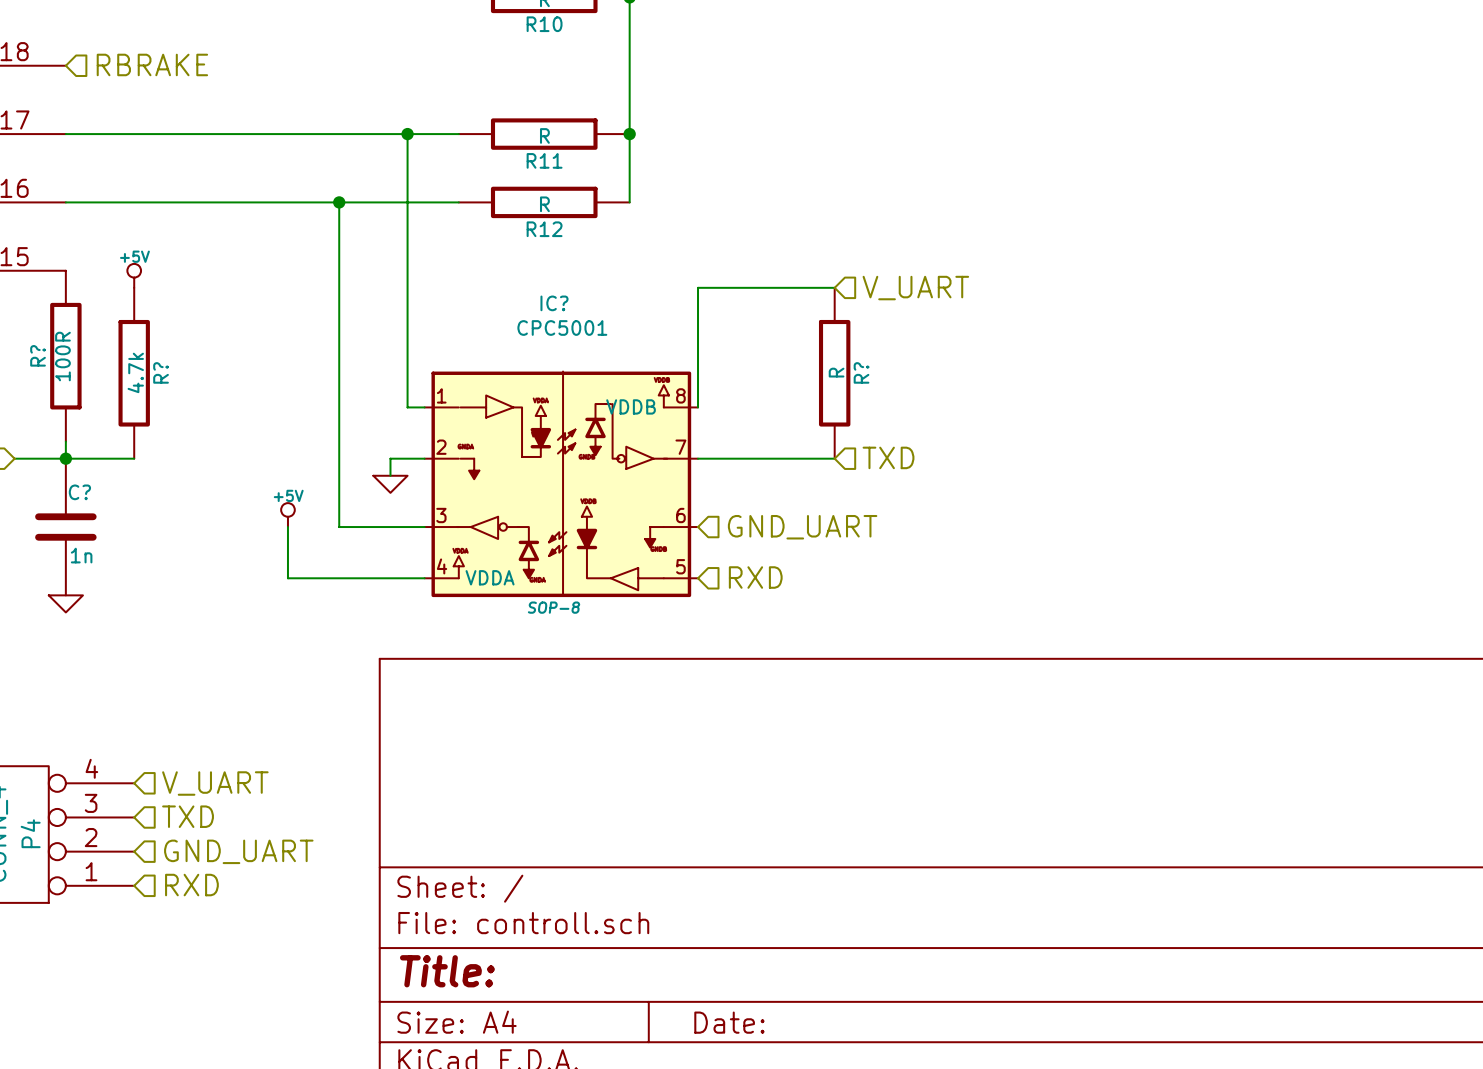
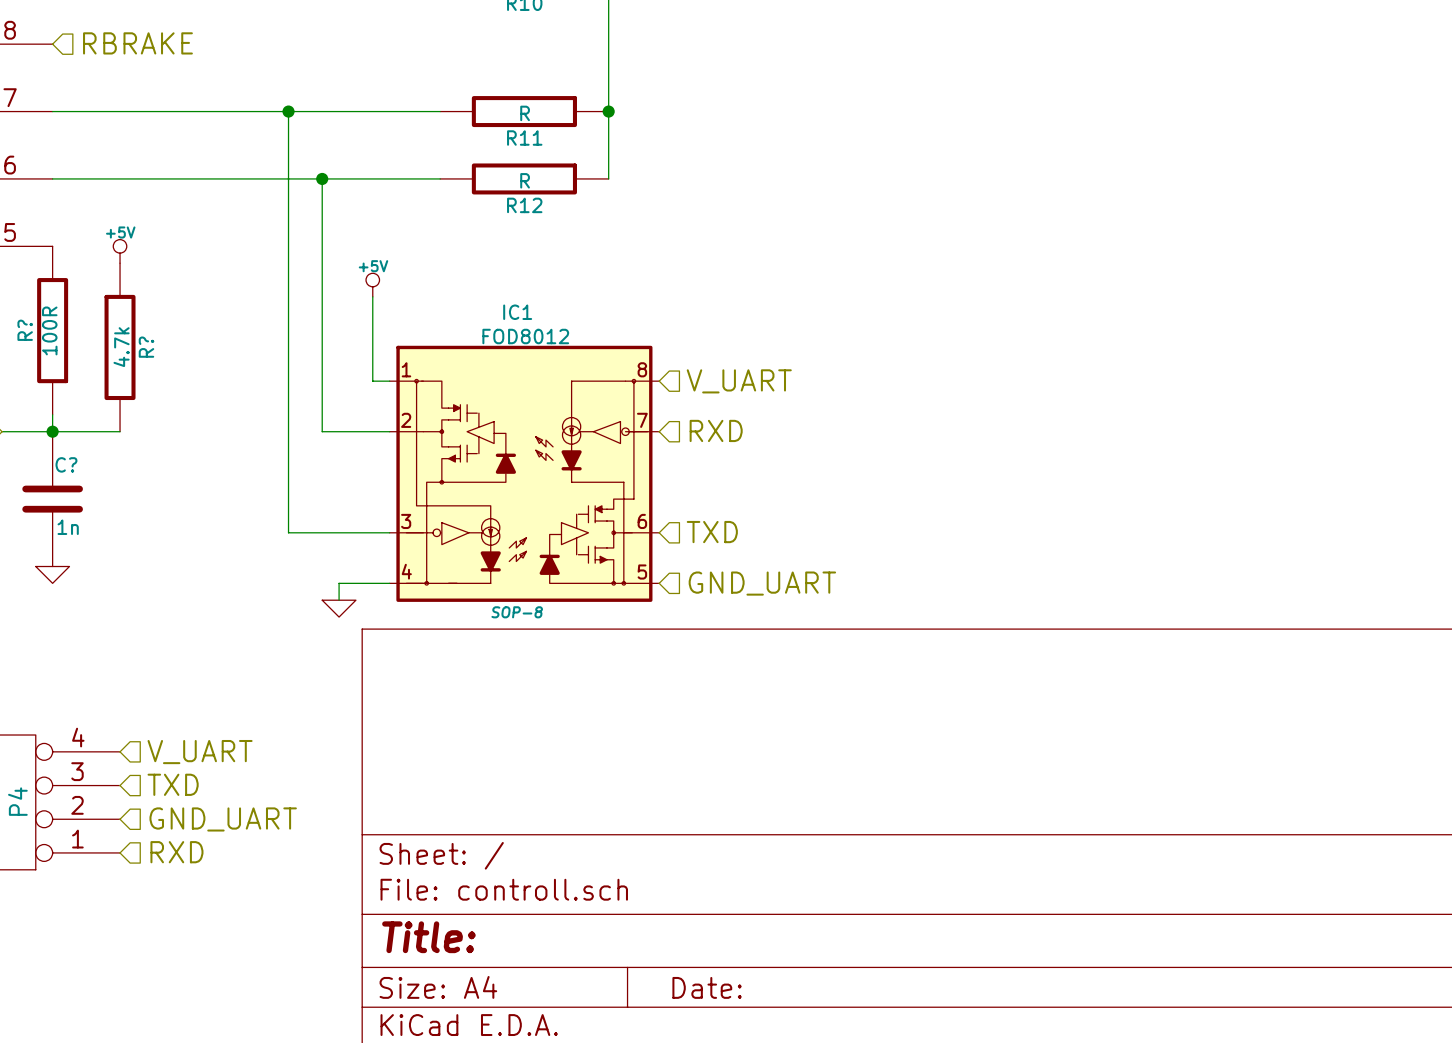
wire: none -> (288, 111) (288, 532) (389, 532)
junction: none -> (288, 111)
wire: (407, 134) (407, 407) (424, 407) -> none
junction: (407, 134) -> none
wire: (834, 287) (698, 287) (698, 407) -> none
hierarchical label position: V_UART (915, 288) -> V_UART (739, 381)
wire: none -> (372, 296) (372, 381) (389, 381)
R?: R (834, 373) -> none
hierarchical label position: TXD (888, 457) -> TXD (712, 532)
wire: (339, 458) (339, 527) (424, 527) -> none
wire: (390, 458) (390, 475) -> (372, 431) (322, 431)
wire: (698, 458) (834, 458) -> none
power symbol position: (390, 484) -> (339, 608)
IC?: CPC5001 (561, 484) -> none
IC1: none -> FOD8012 (524, 473)
power symbol position: +5V (287, 515) -> +5V (372, 285)
wire: (287, 527) (287, 578) (424, 578) -> none
hierarchical label position: GND_UART (802, 527) -> GND_UART (762, 583)
hierarchical label position: RXD (755, 577) -> RXD (716, 430)
wire: none -> (389, 583) (339, 583) (339, 600)

